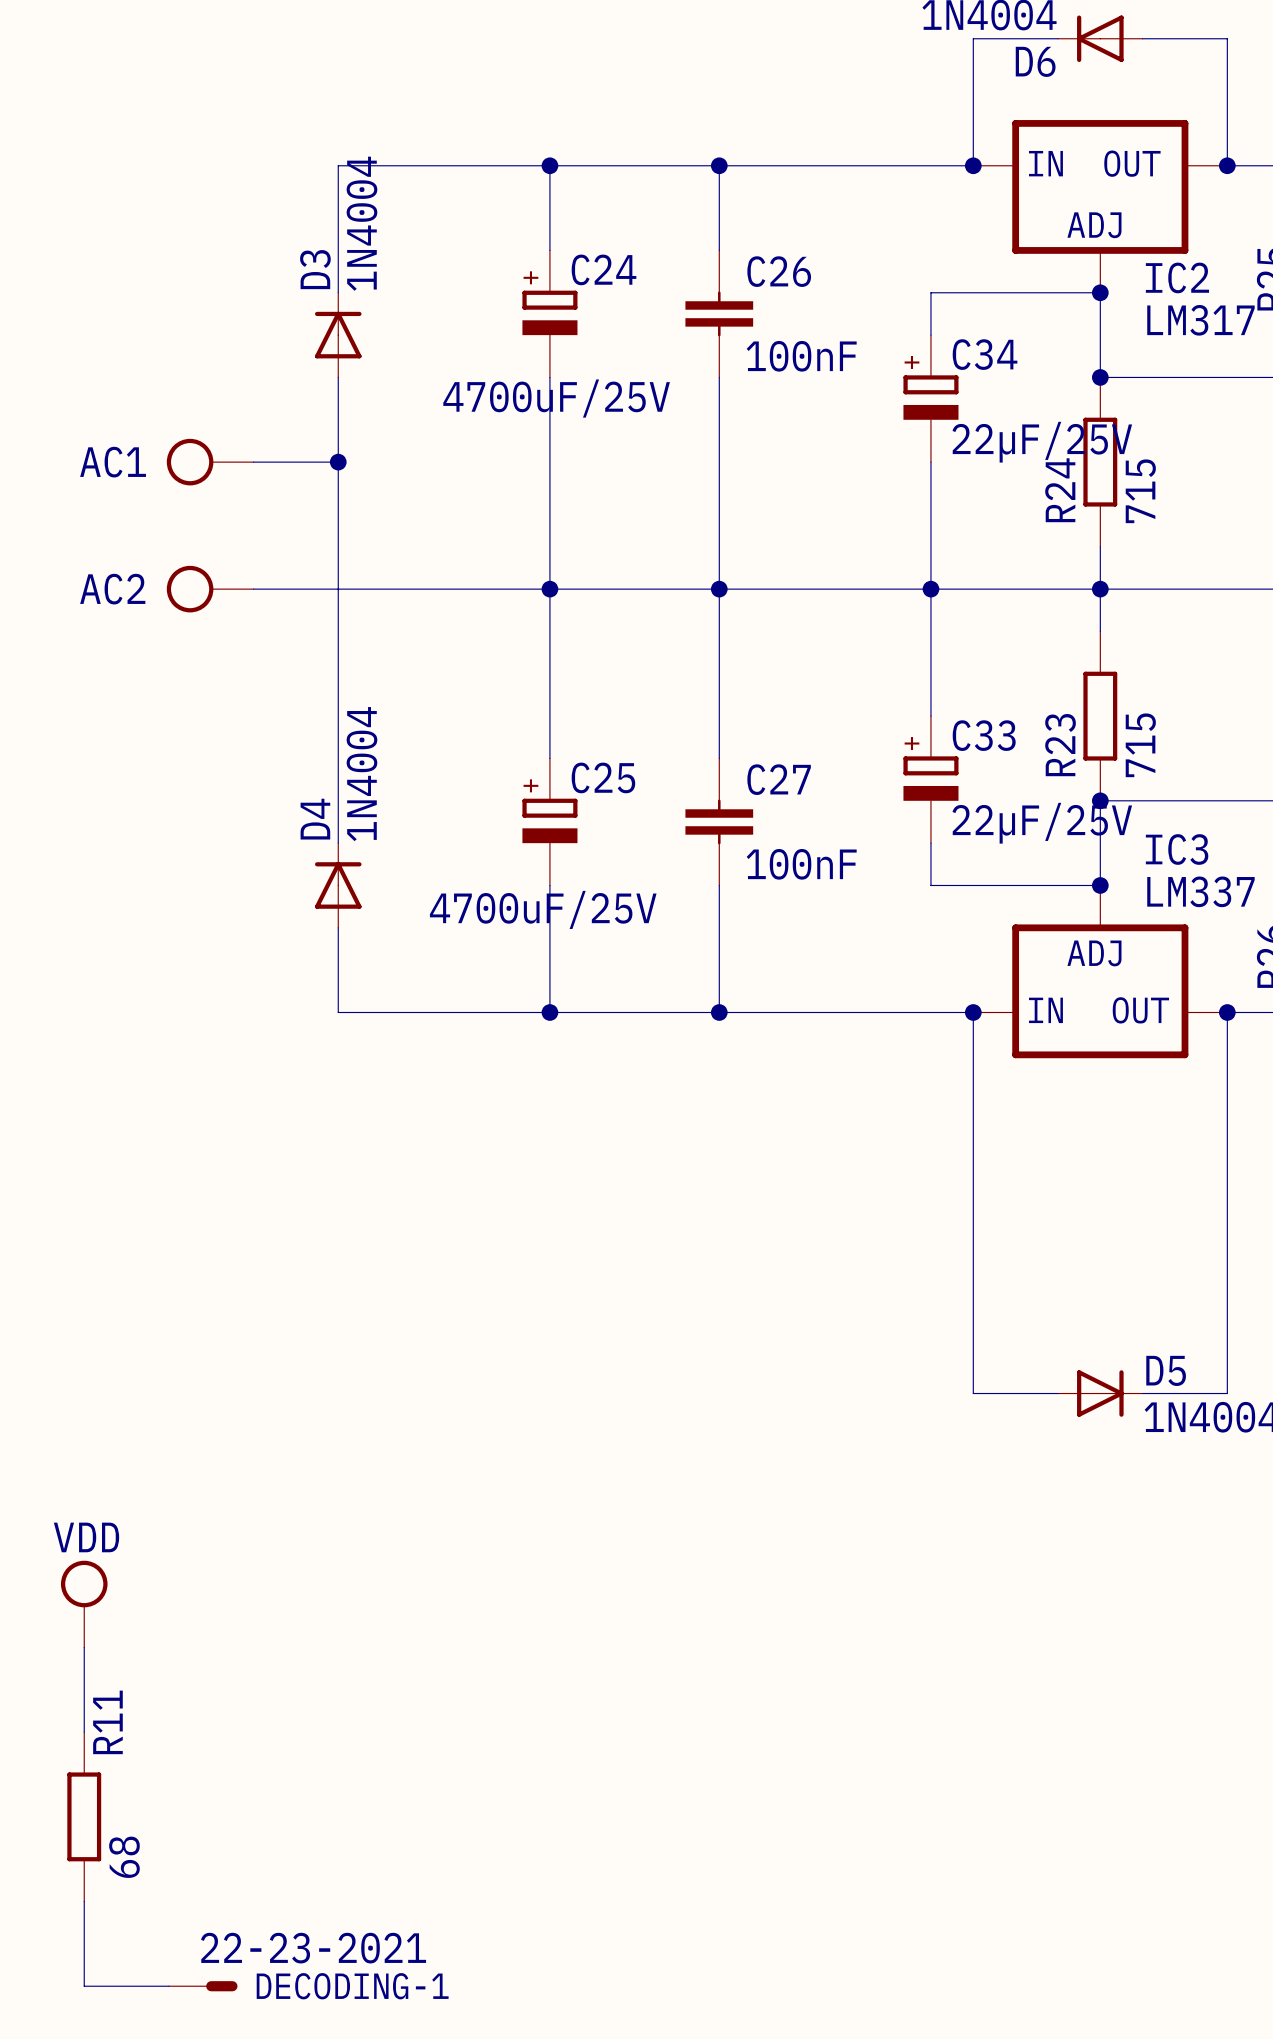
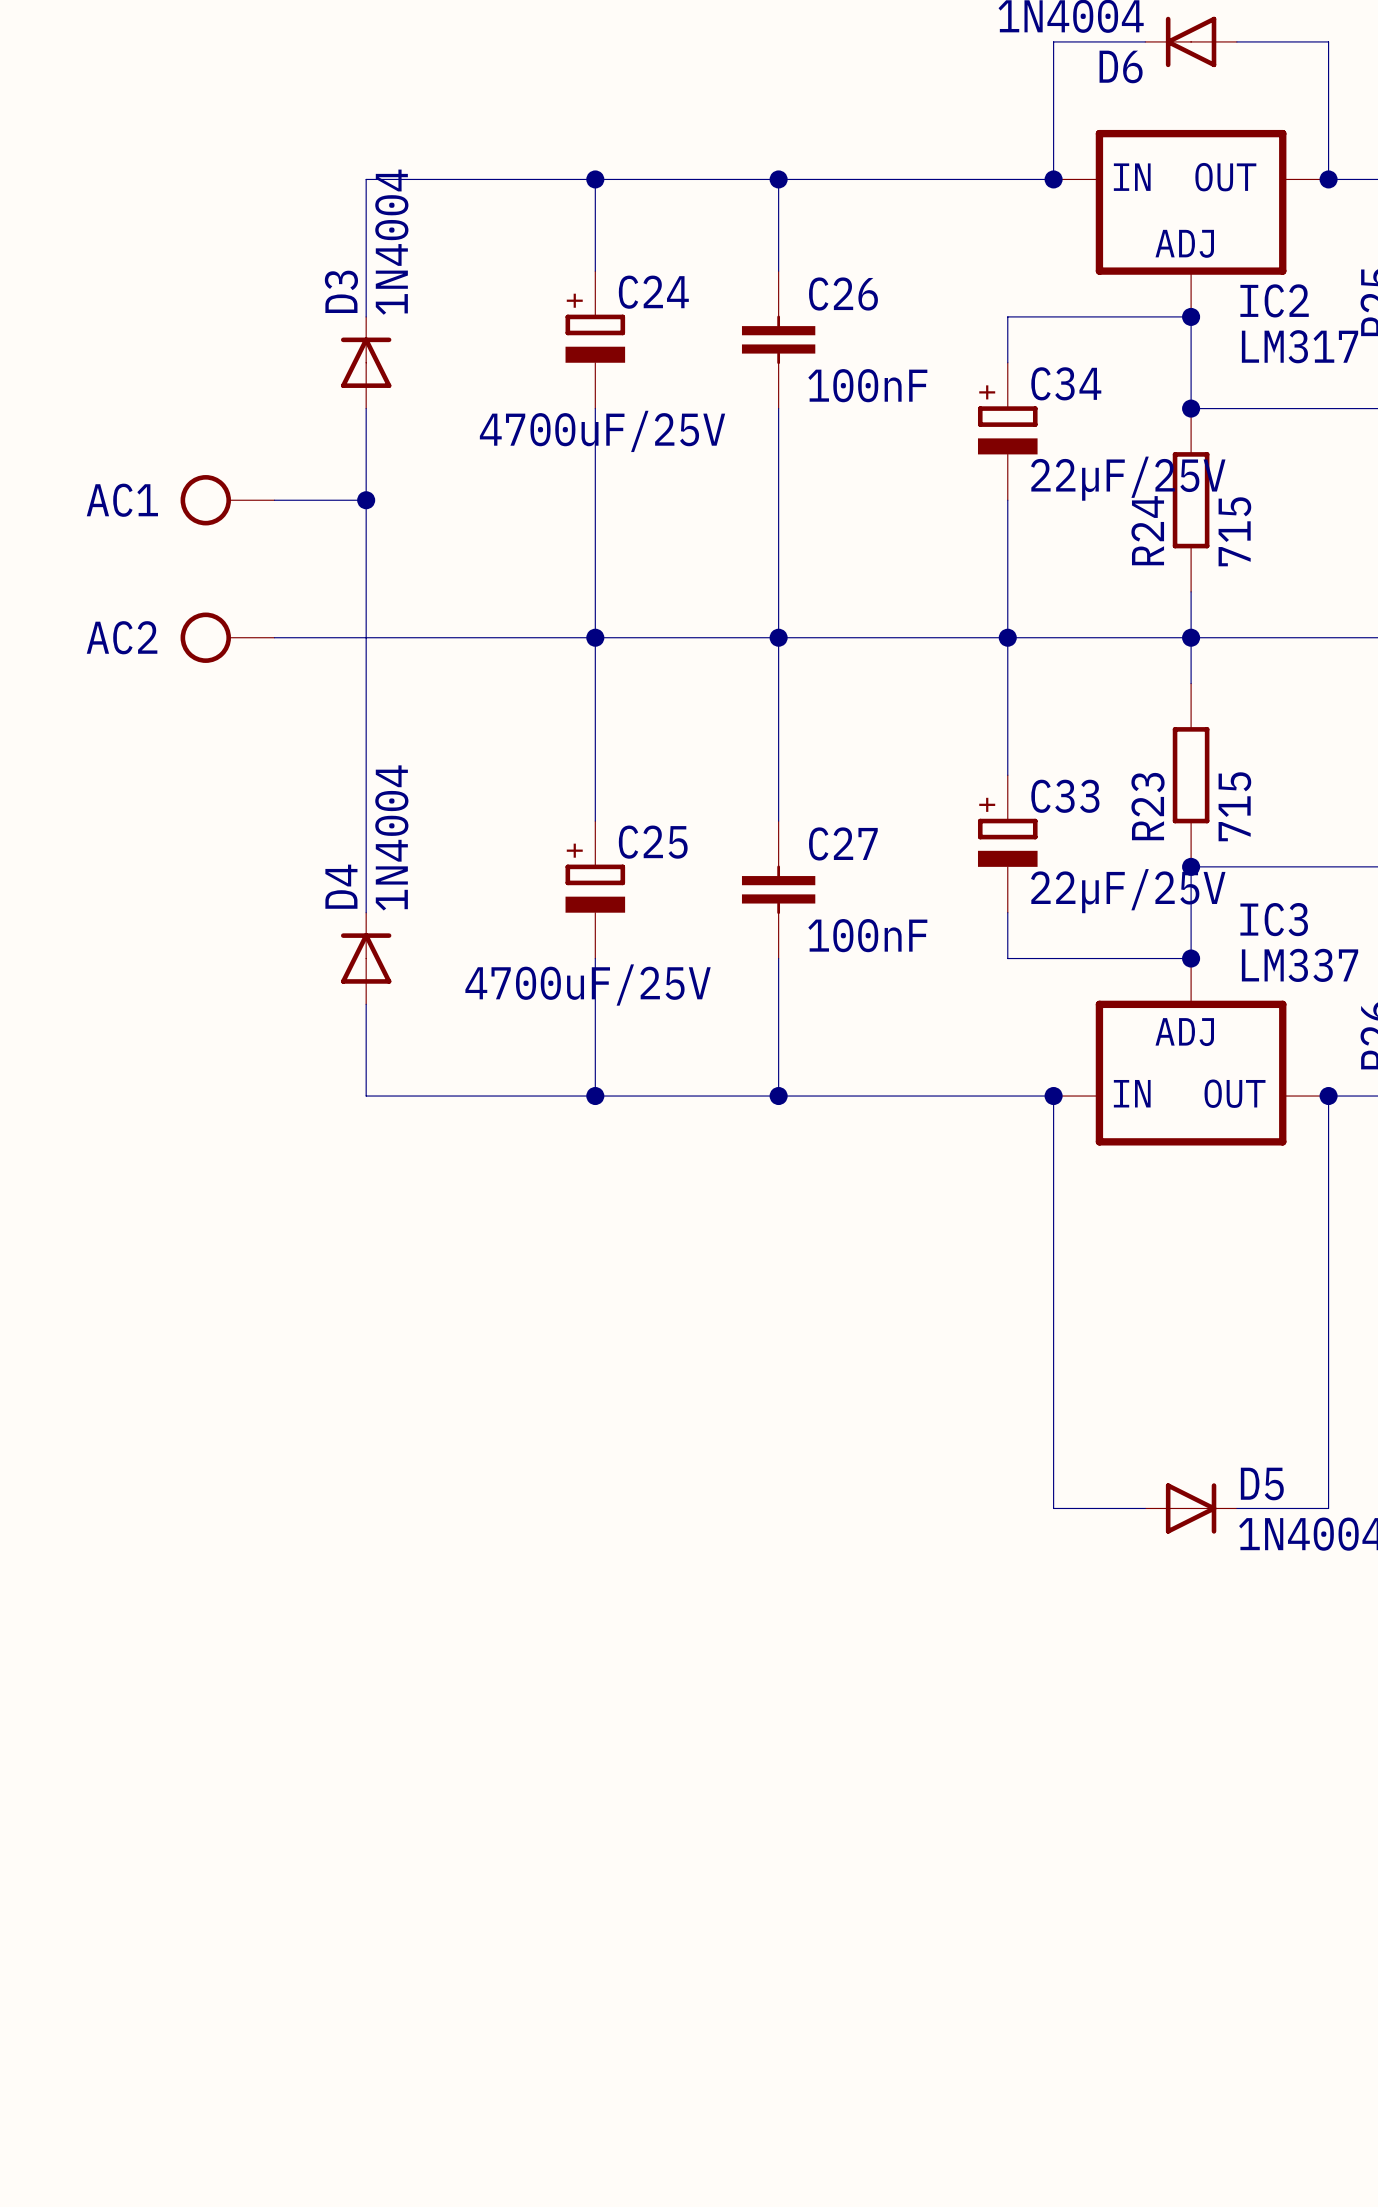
power symbol: VDD (84, 1604) -> none
wire: (84, 1647) (84, 1732) -> none
R11: 68 (84, 1816) -> none
wire: (84, 1901) (84, 1986) (168, 1986) -> none
DECODING-1: 22-23-2021 (203, 1986) -> none

